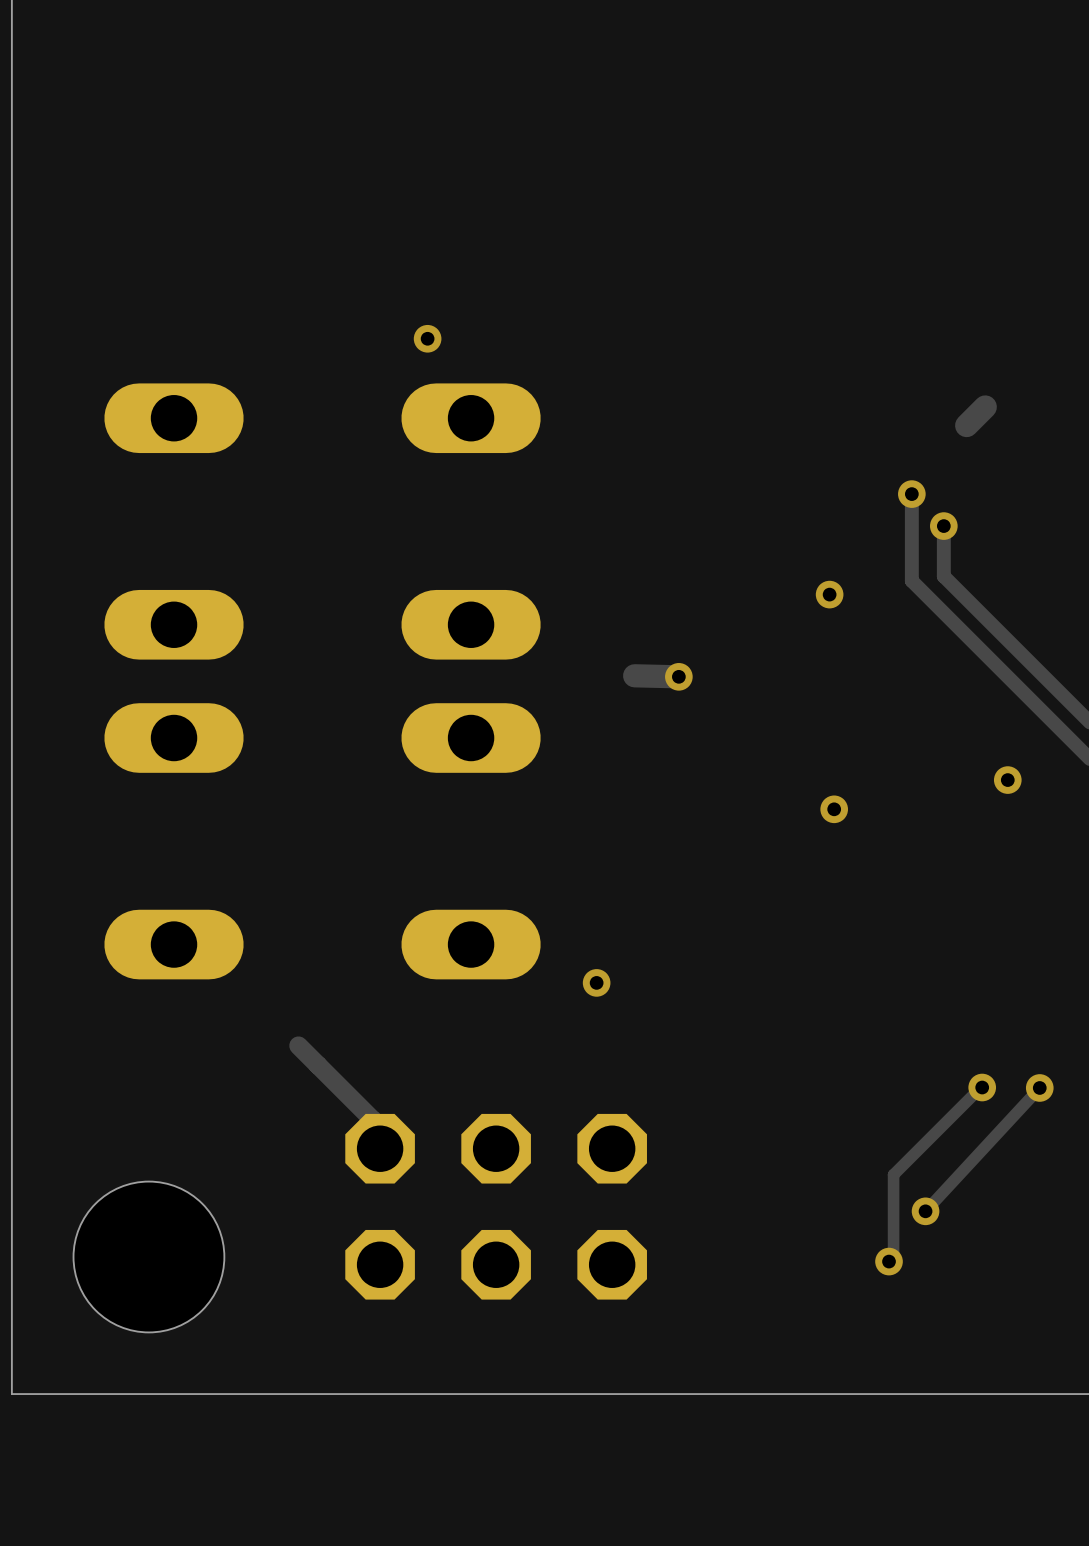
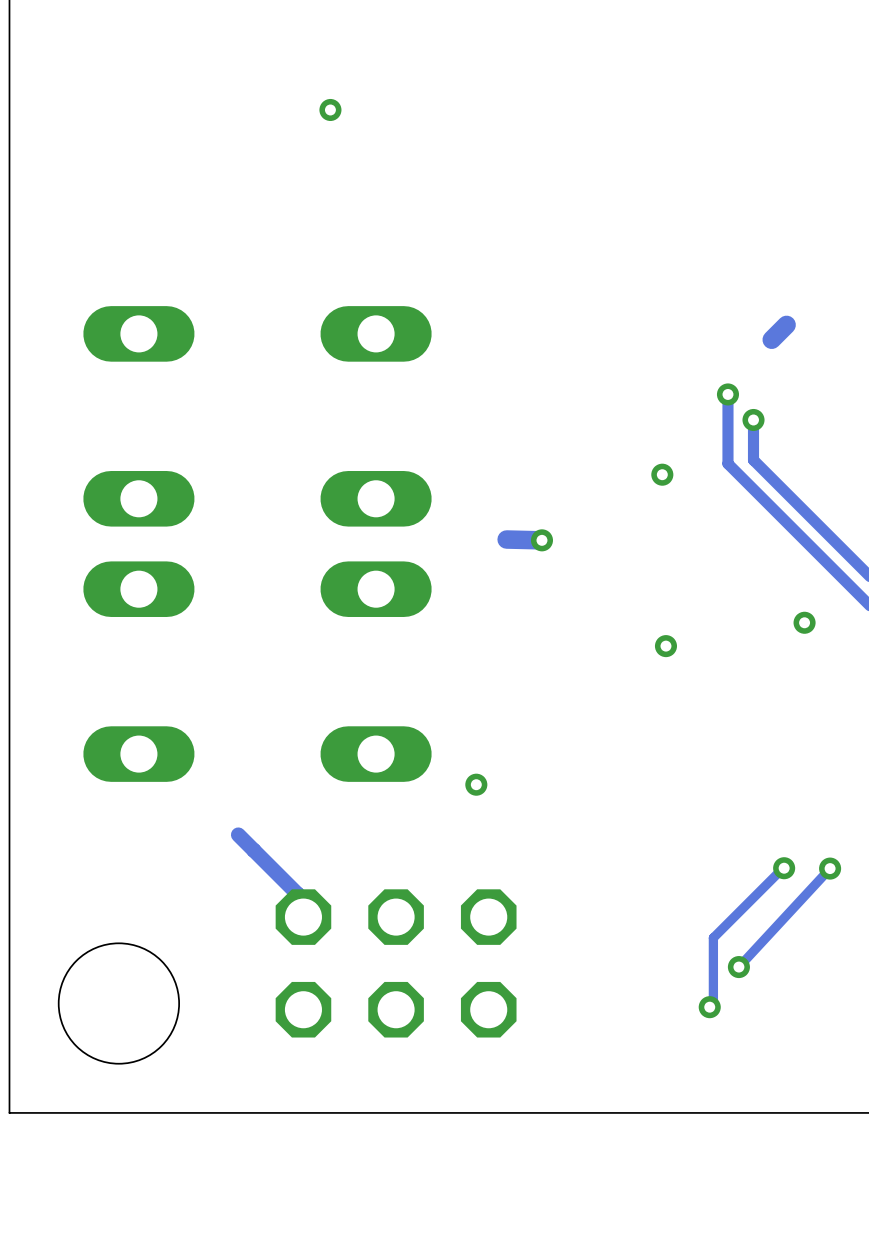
via position: (427, 338) -> (330, 109)

